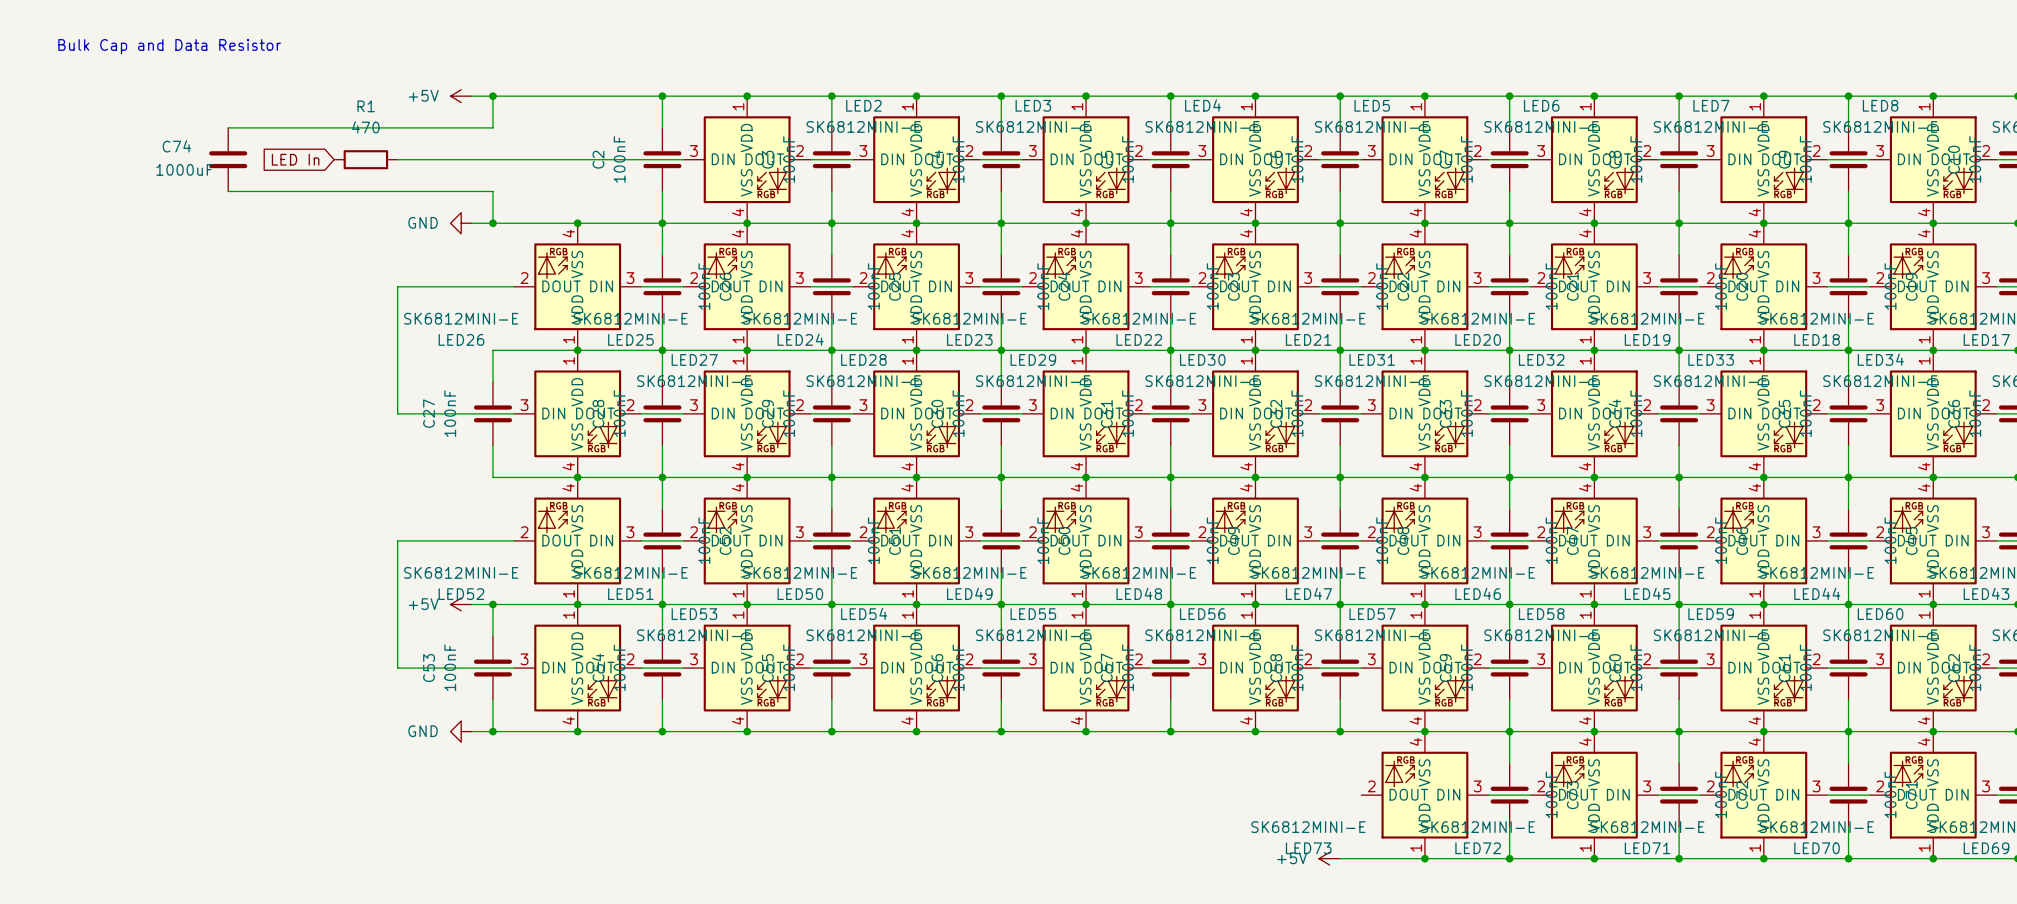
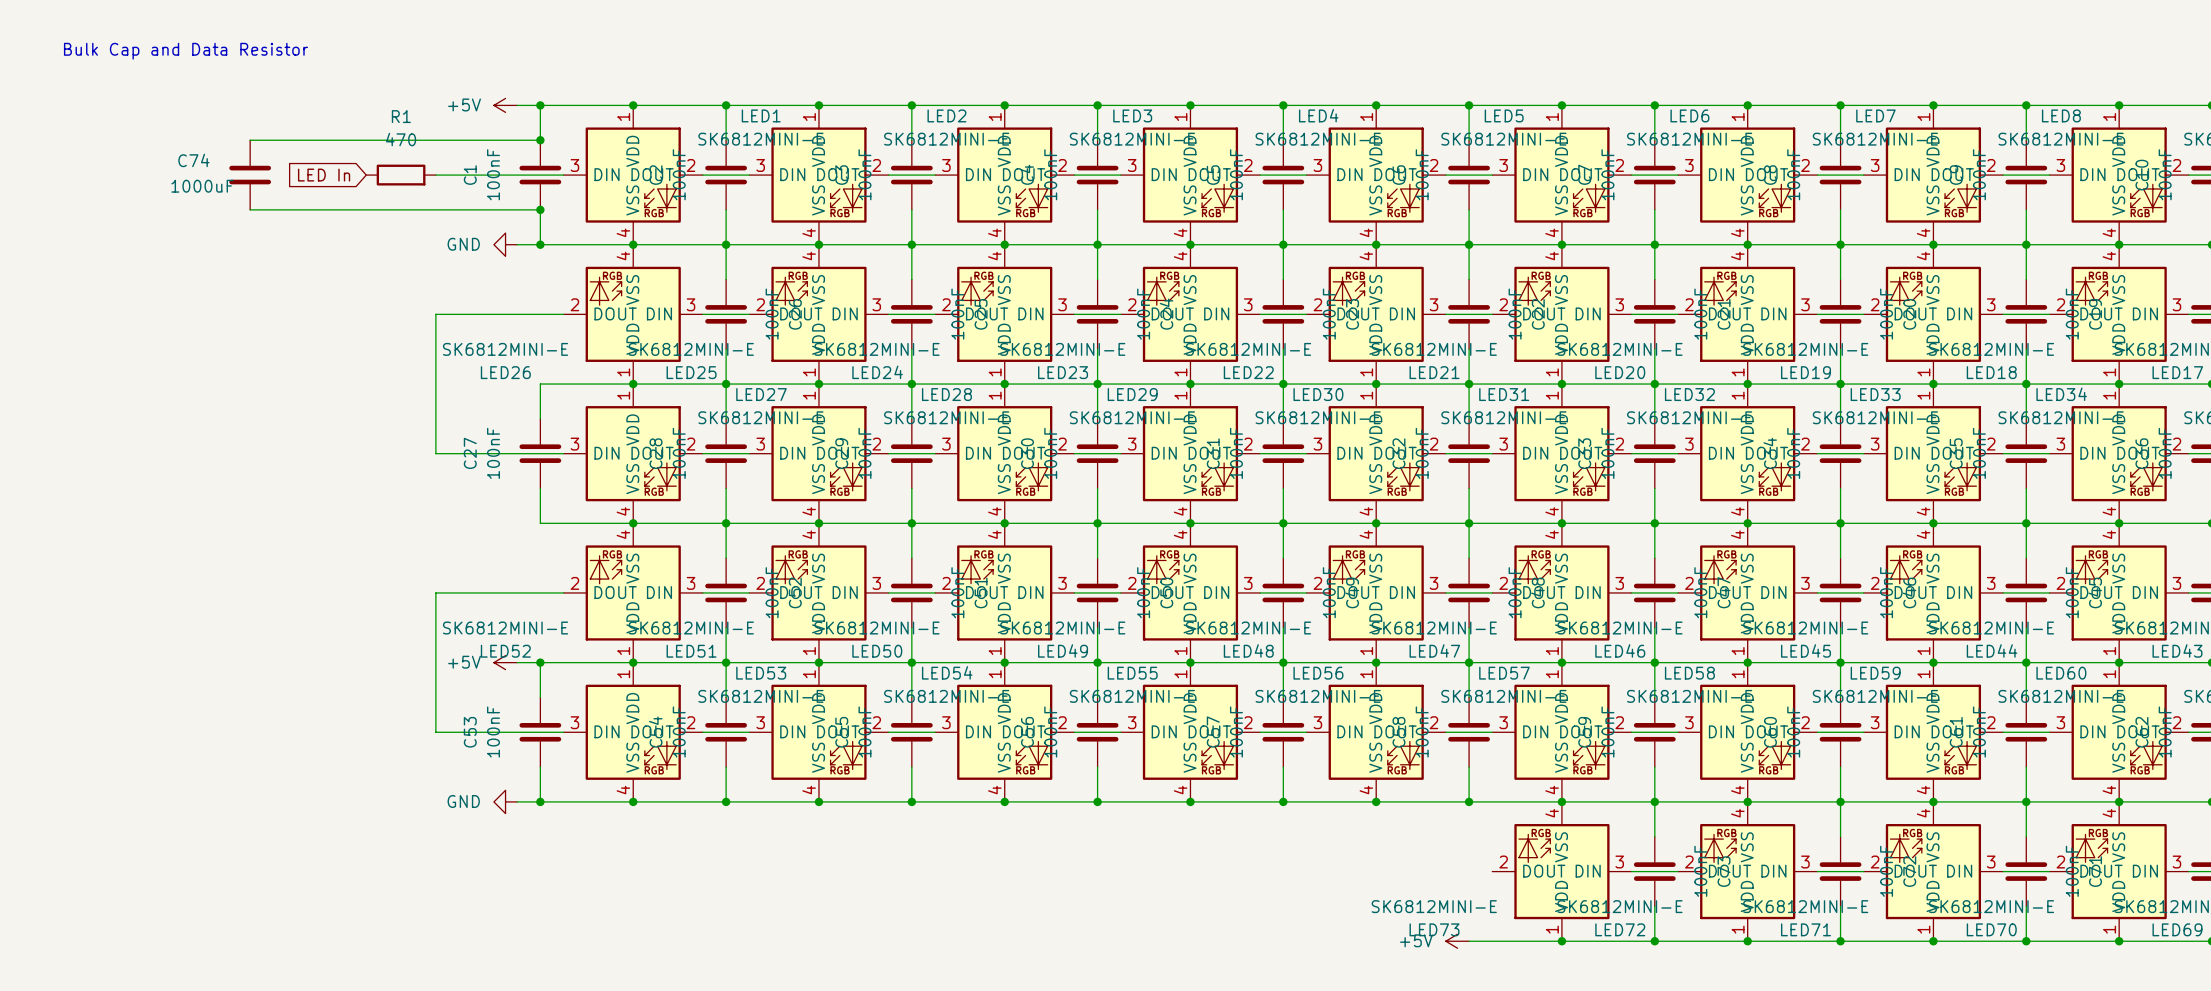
junction: none -> (633, 105)
junction: none -> (540, 140)
C1: none -> 100nF (540, 175)
LED1: none -> SK6812MINI-E (633, 175)
junction: none -> (540, 209)

